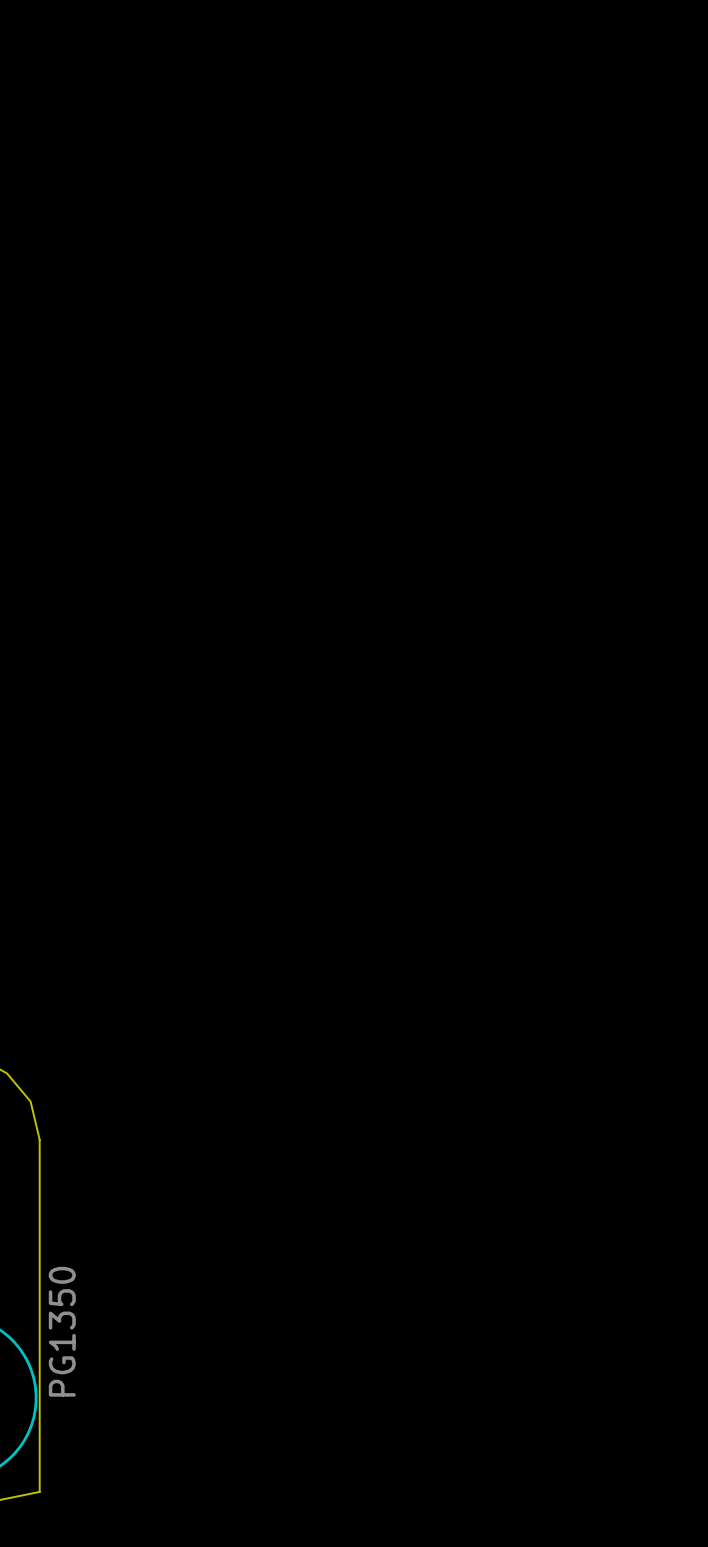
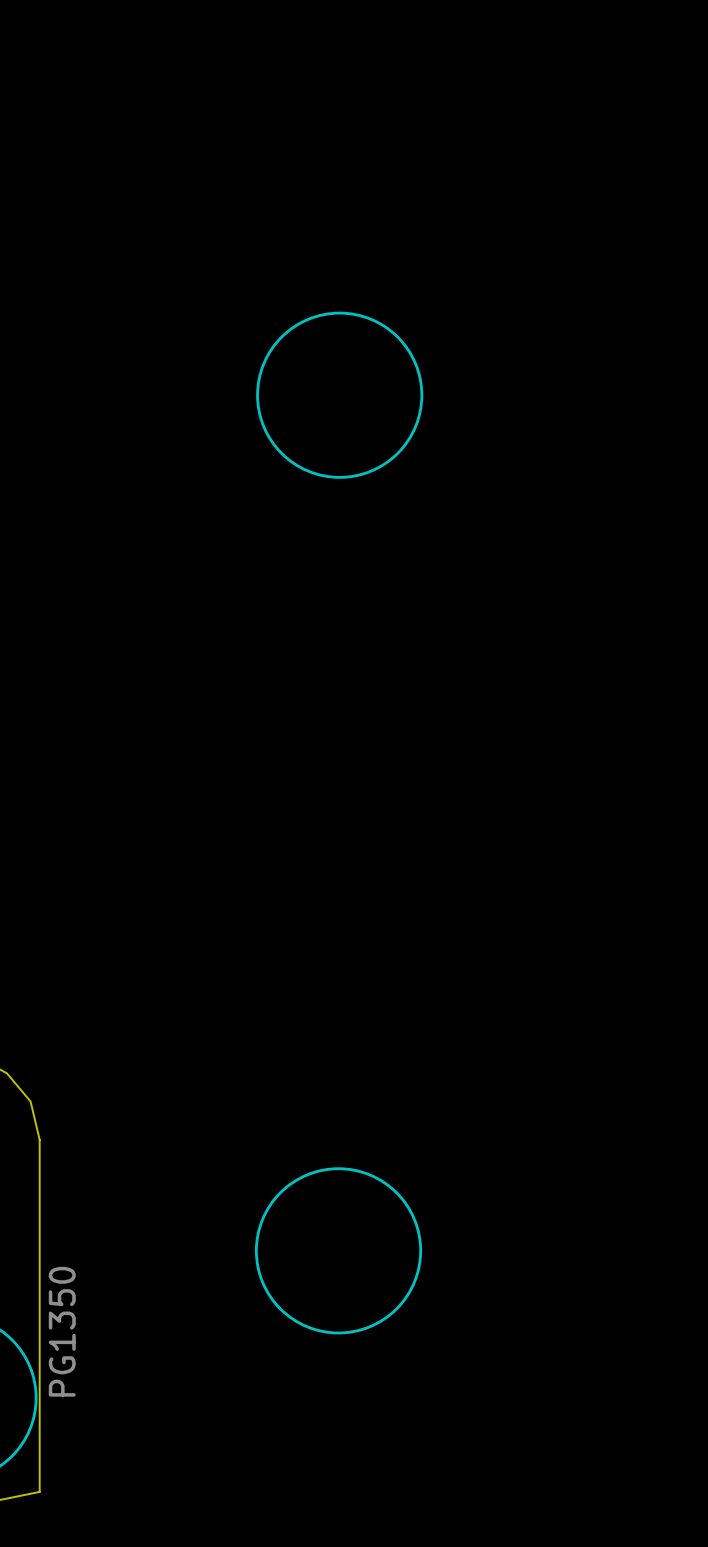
drawing: none -> [256, 311, 424, 479]
drawing: none -> [254, 1167, 423, 1335]

